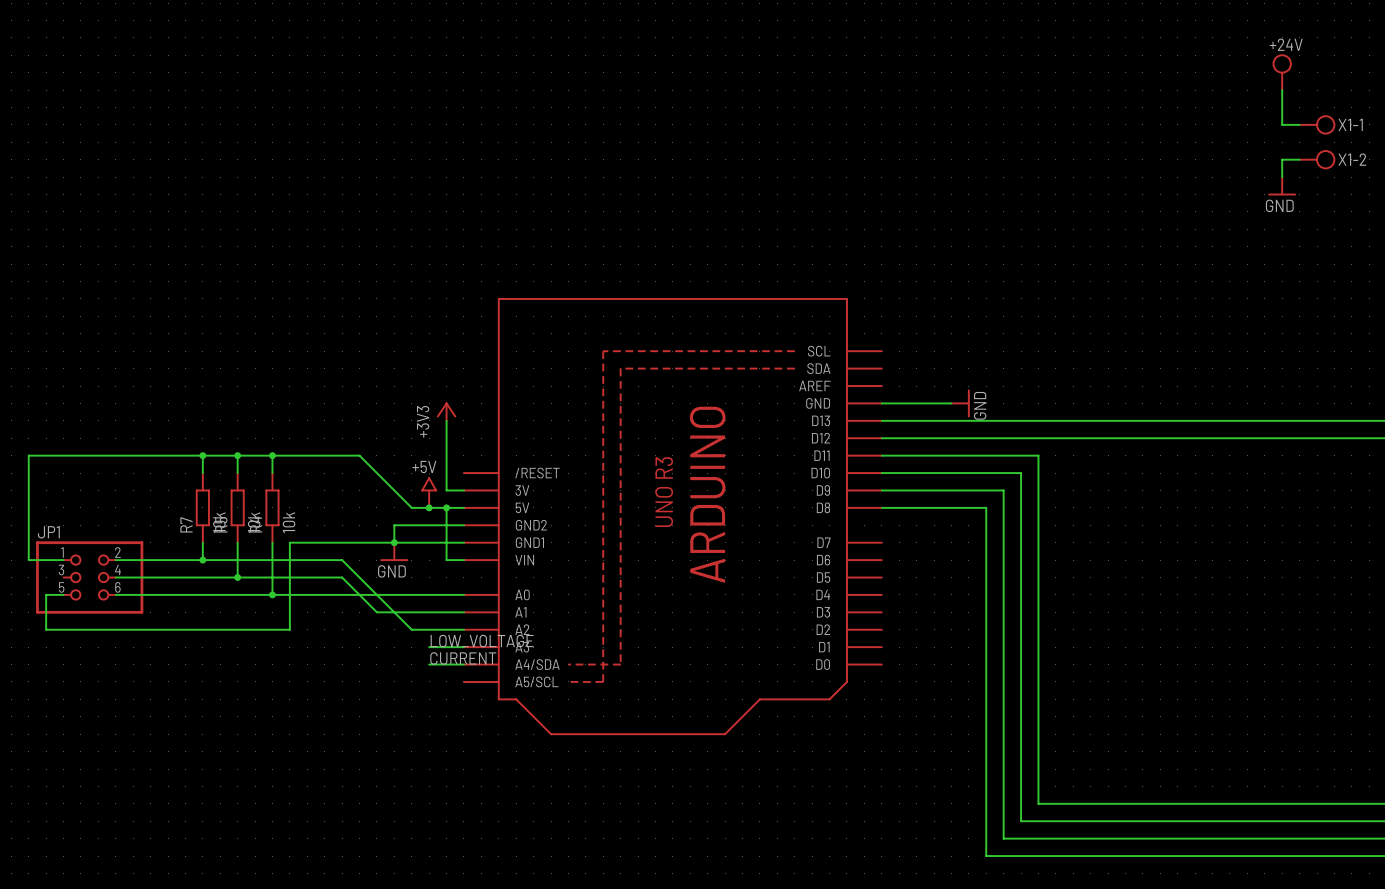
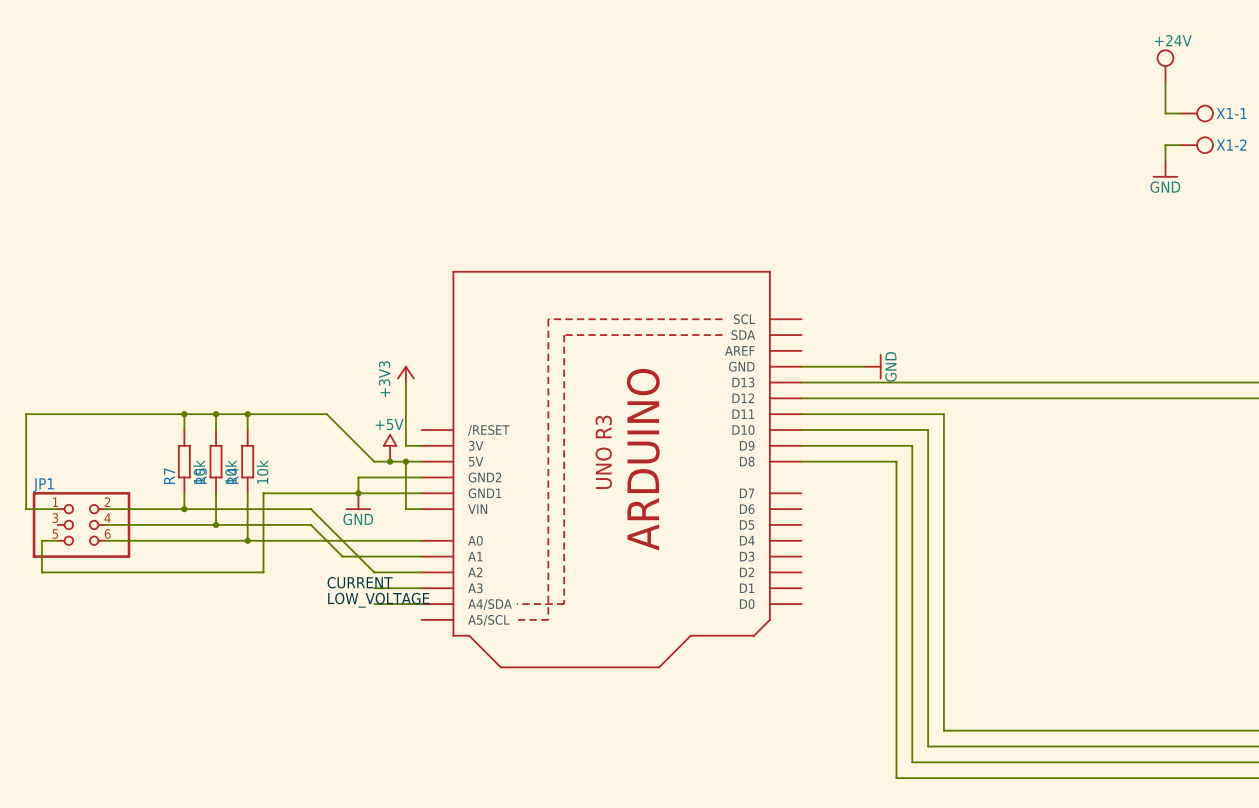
label position: LOW_VOLTAGE (482, 641) -> LOW_VOLTAGE (378, 600)
wire: none -> (374, 588) (390, 588)
label position: CURRENT (463, 658) -> CURRENT (360, 582)
wire: none -> (374, 604) (390, 604)

